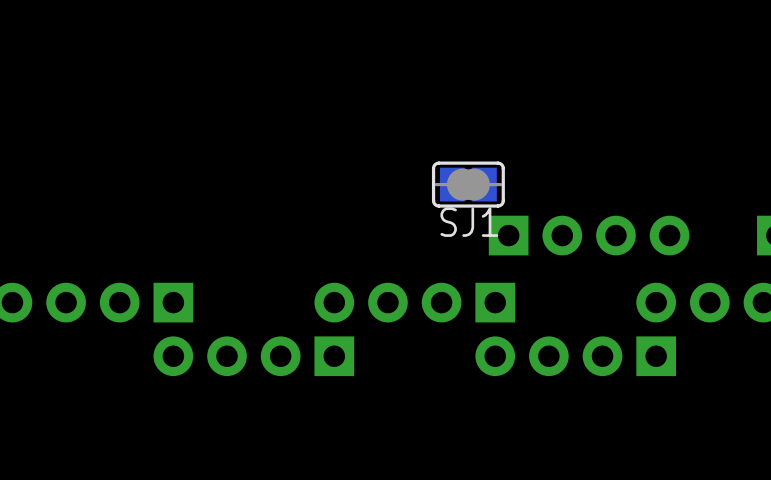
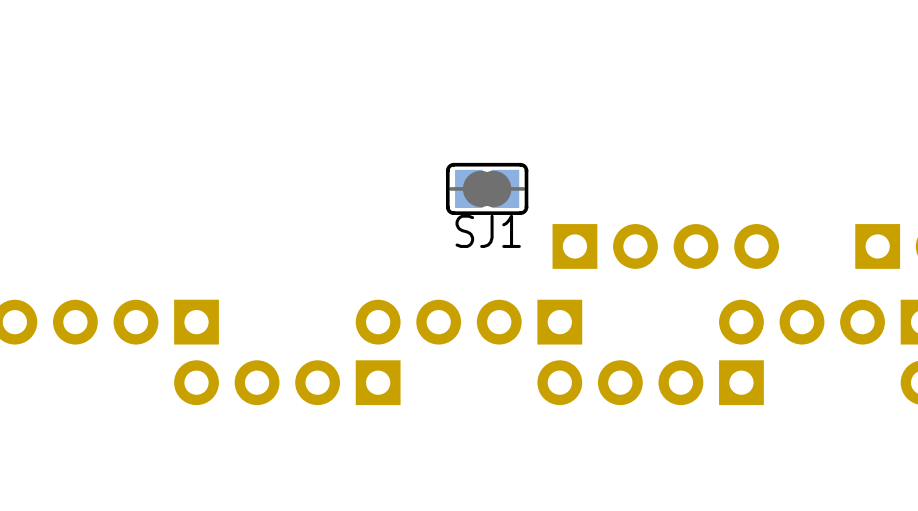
SJ1 position: (468, 184) -> (487, 188)

